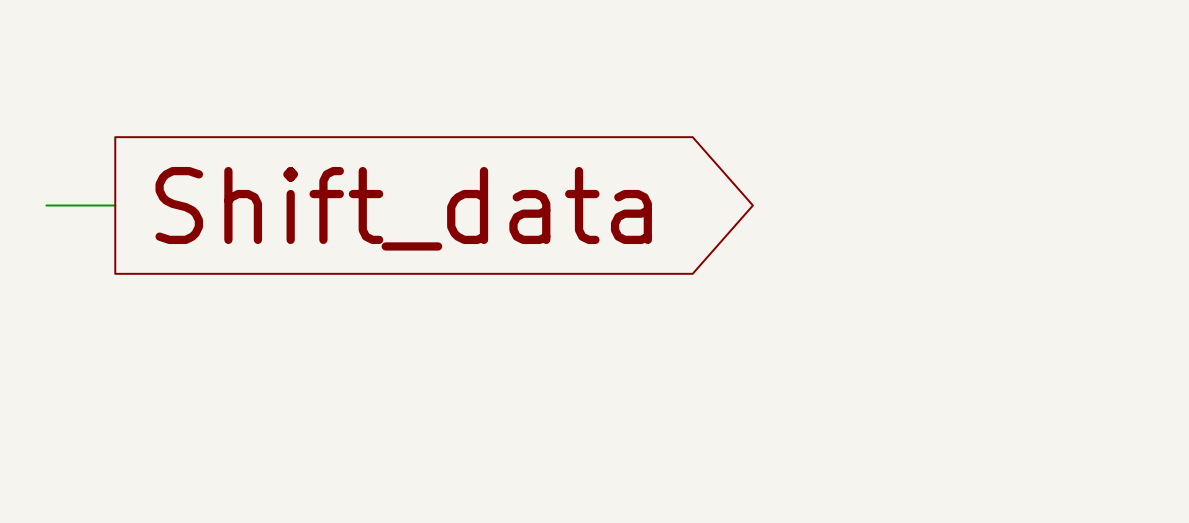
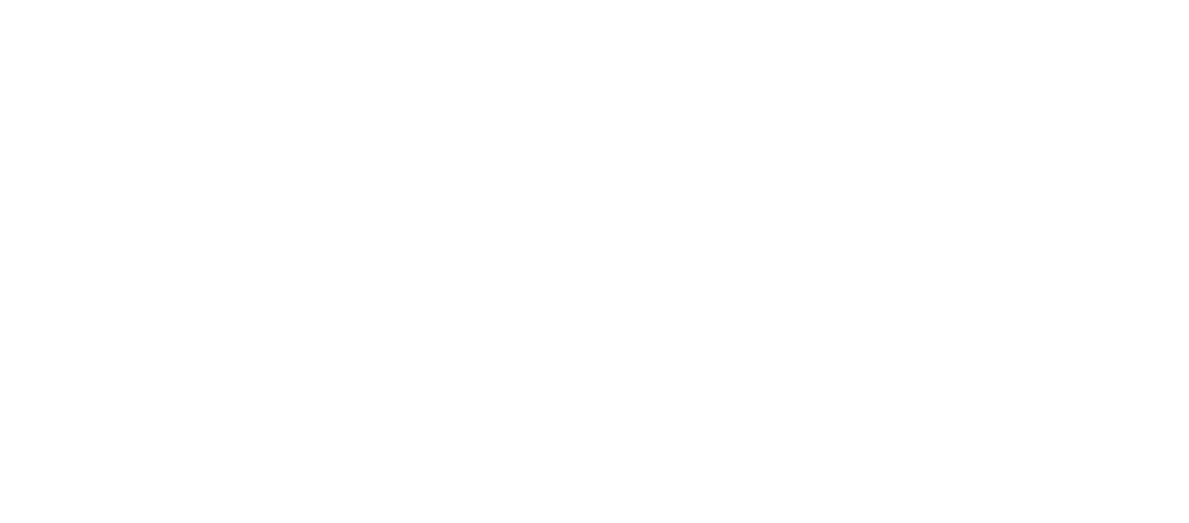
wire: (46, 205) (115, 205) -> none
global label: Shift_data (403, 208) -> none

